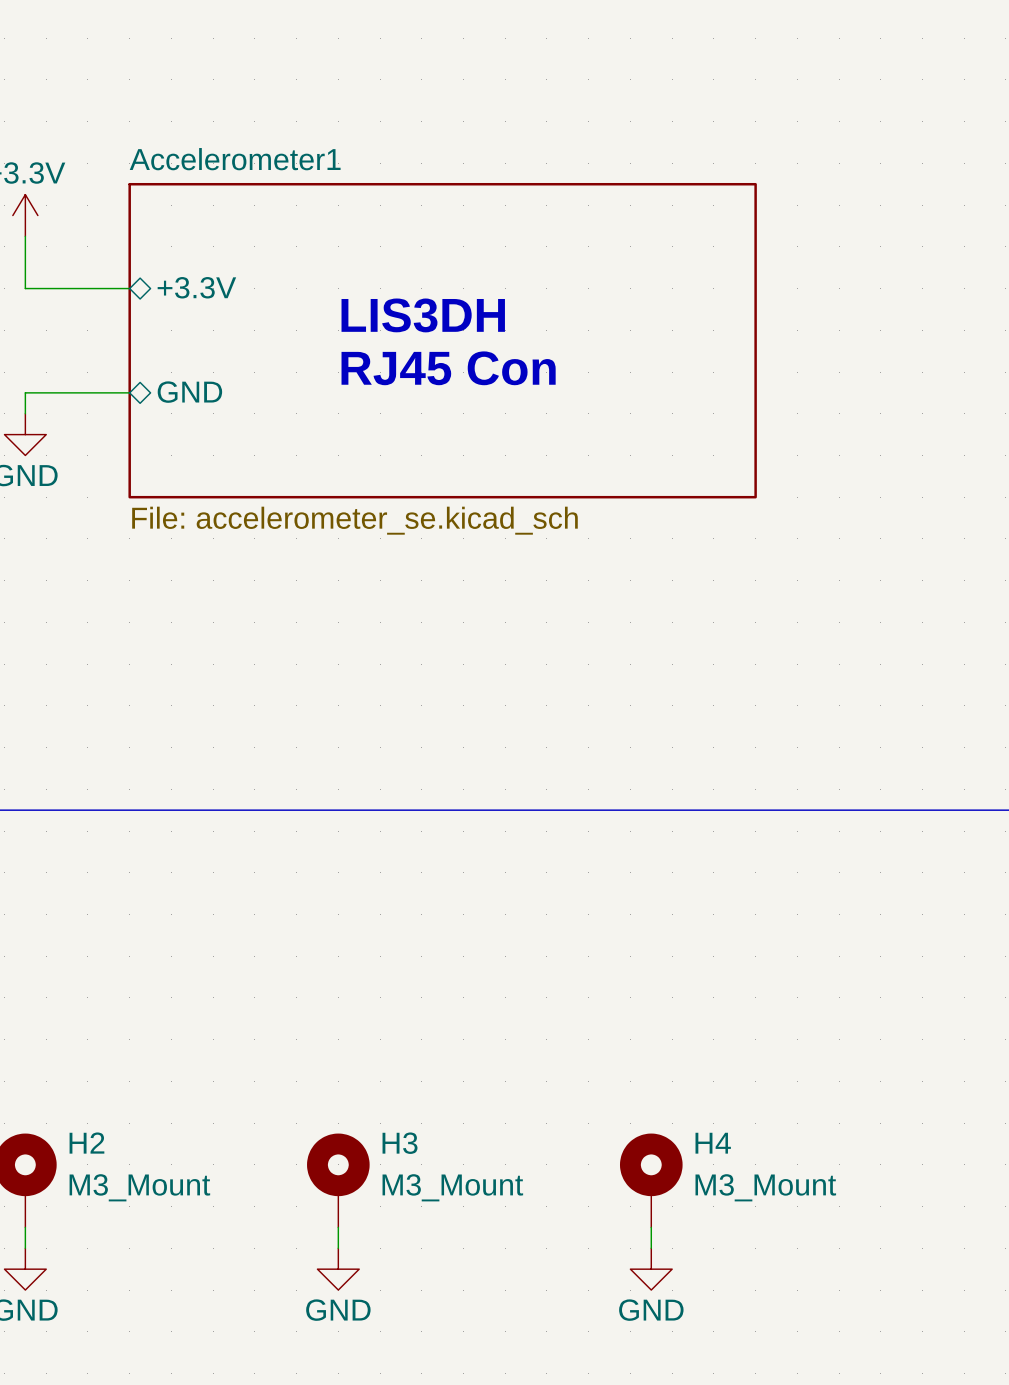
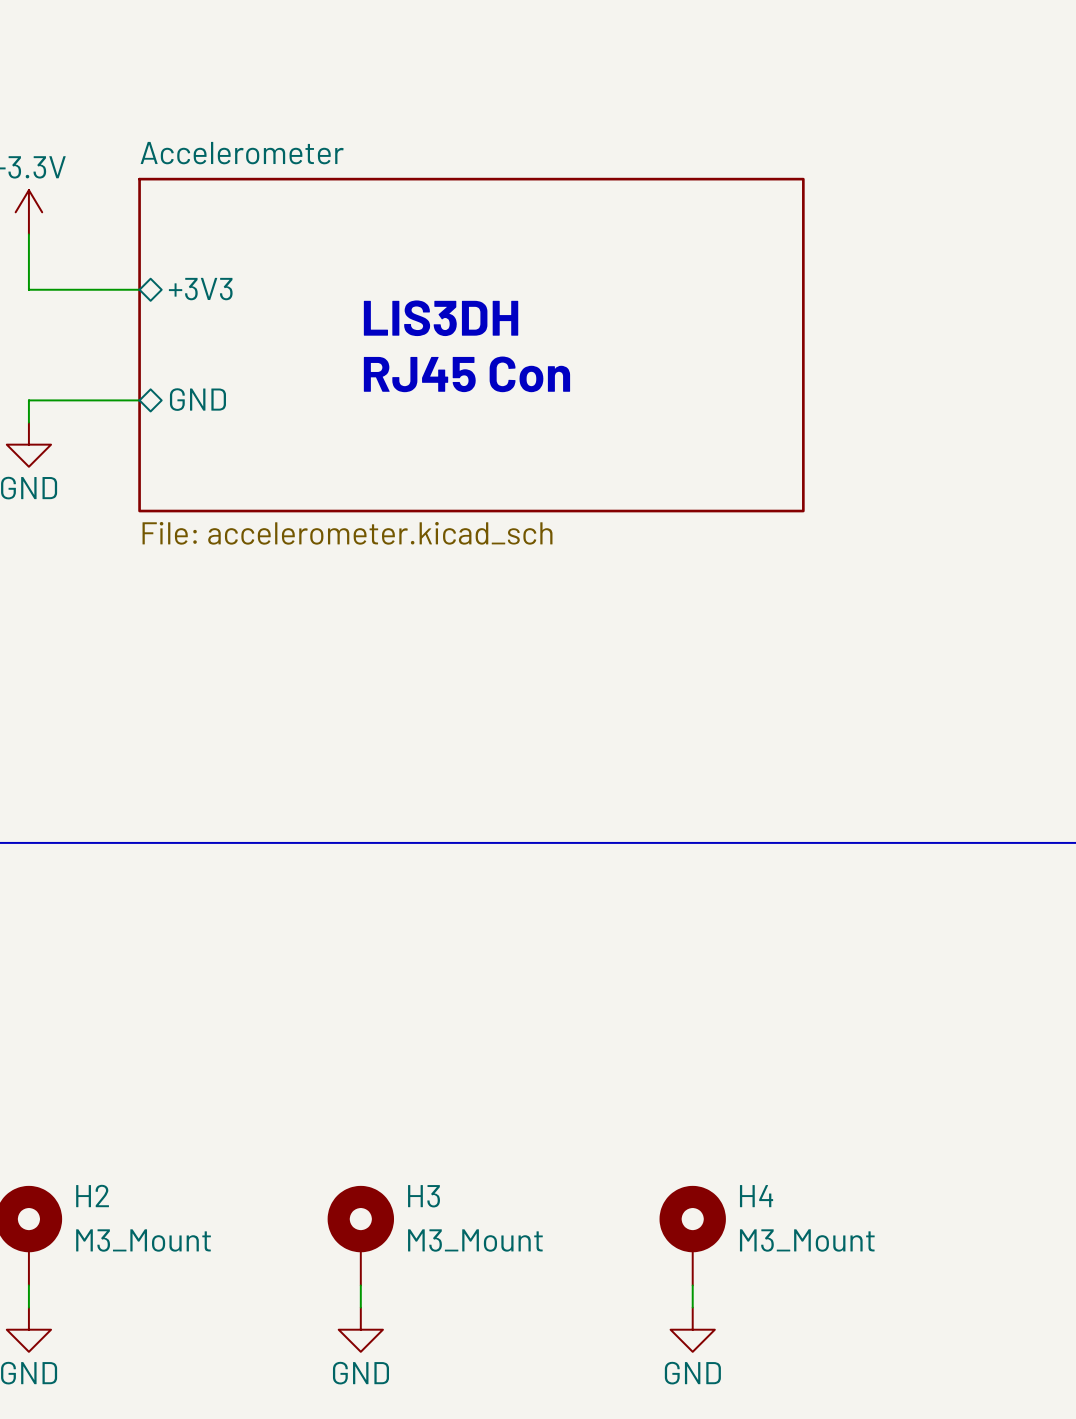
sheet Accelerometer1 name: Accelerometer1 (235, 159) -> Accelerometer (242, 153)
sheet pin: +3.3V (196, 287) -> +3V3 (200, 289)
sheet Accelerometer1 value: File: accelerometer_se.kicad_sch (354, 520) -> File: accelerometer.kicad_sch (347, 533)

